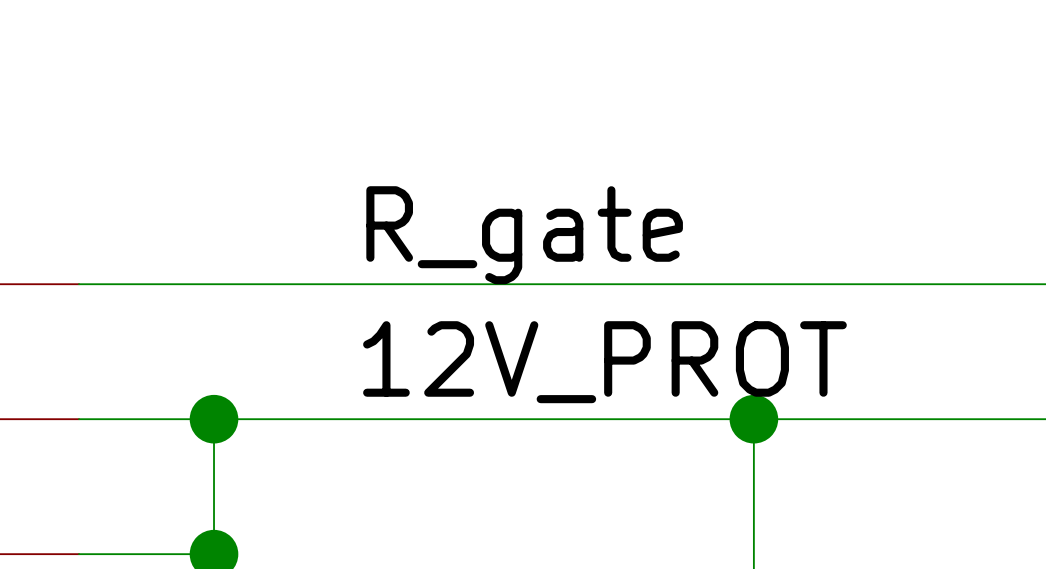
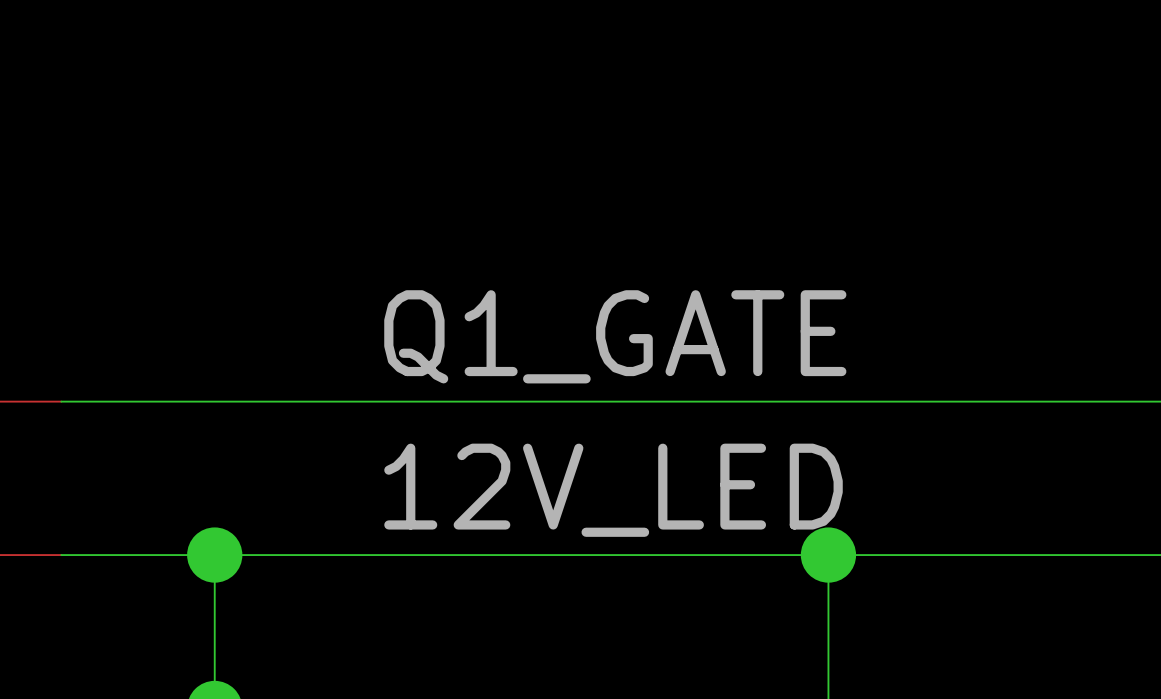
label: R_gate (524, 235) -> Q1_GATE (615, 336)
label: 12V_PROT (604, 362) -> 12V_LED (613, 490)

